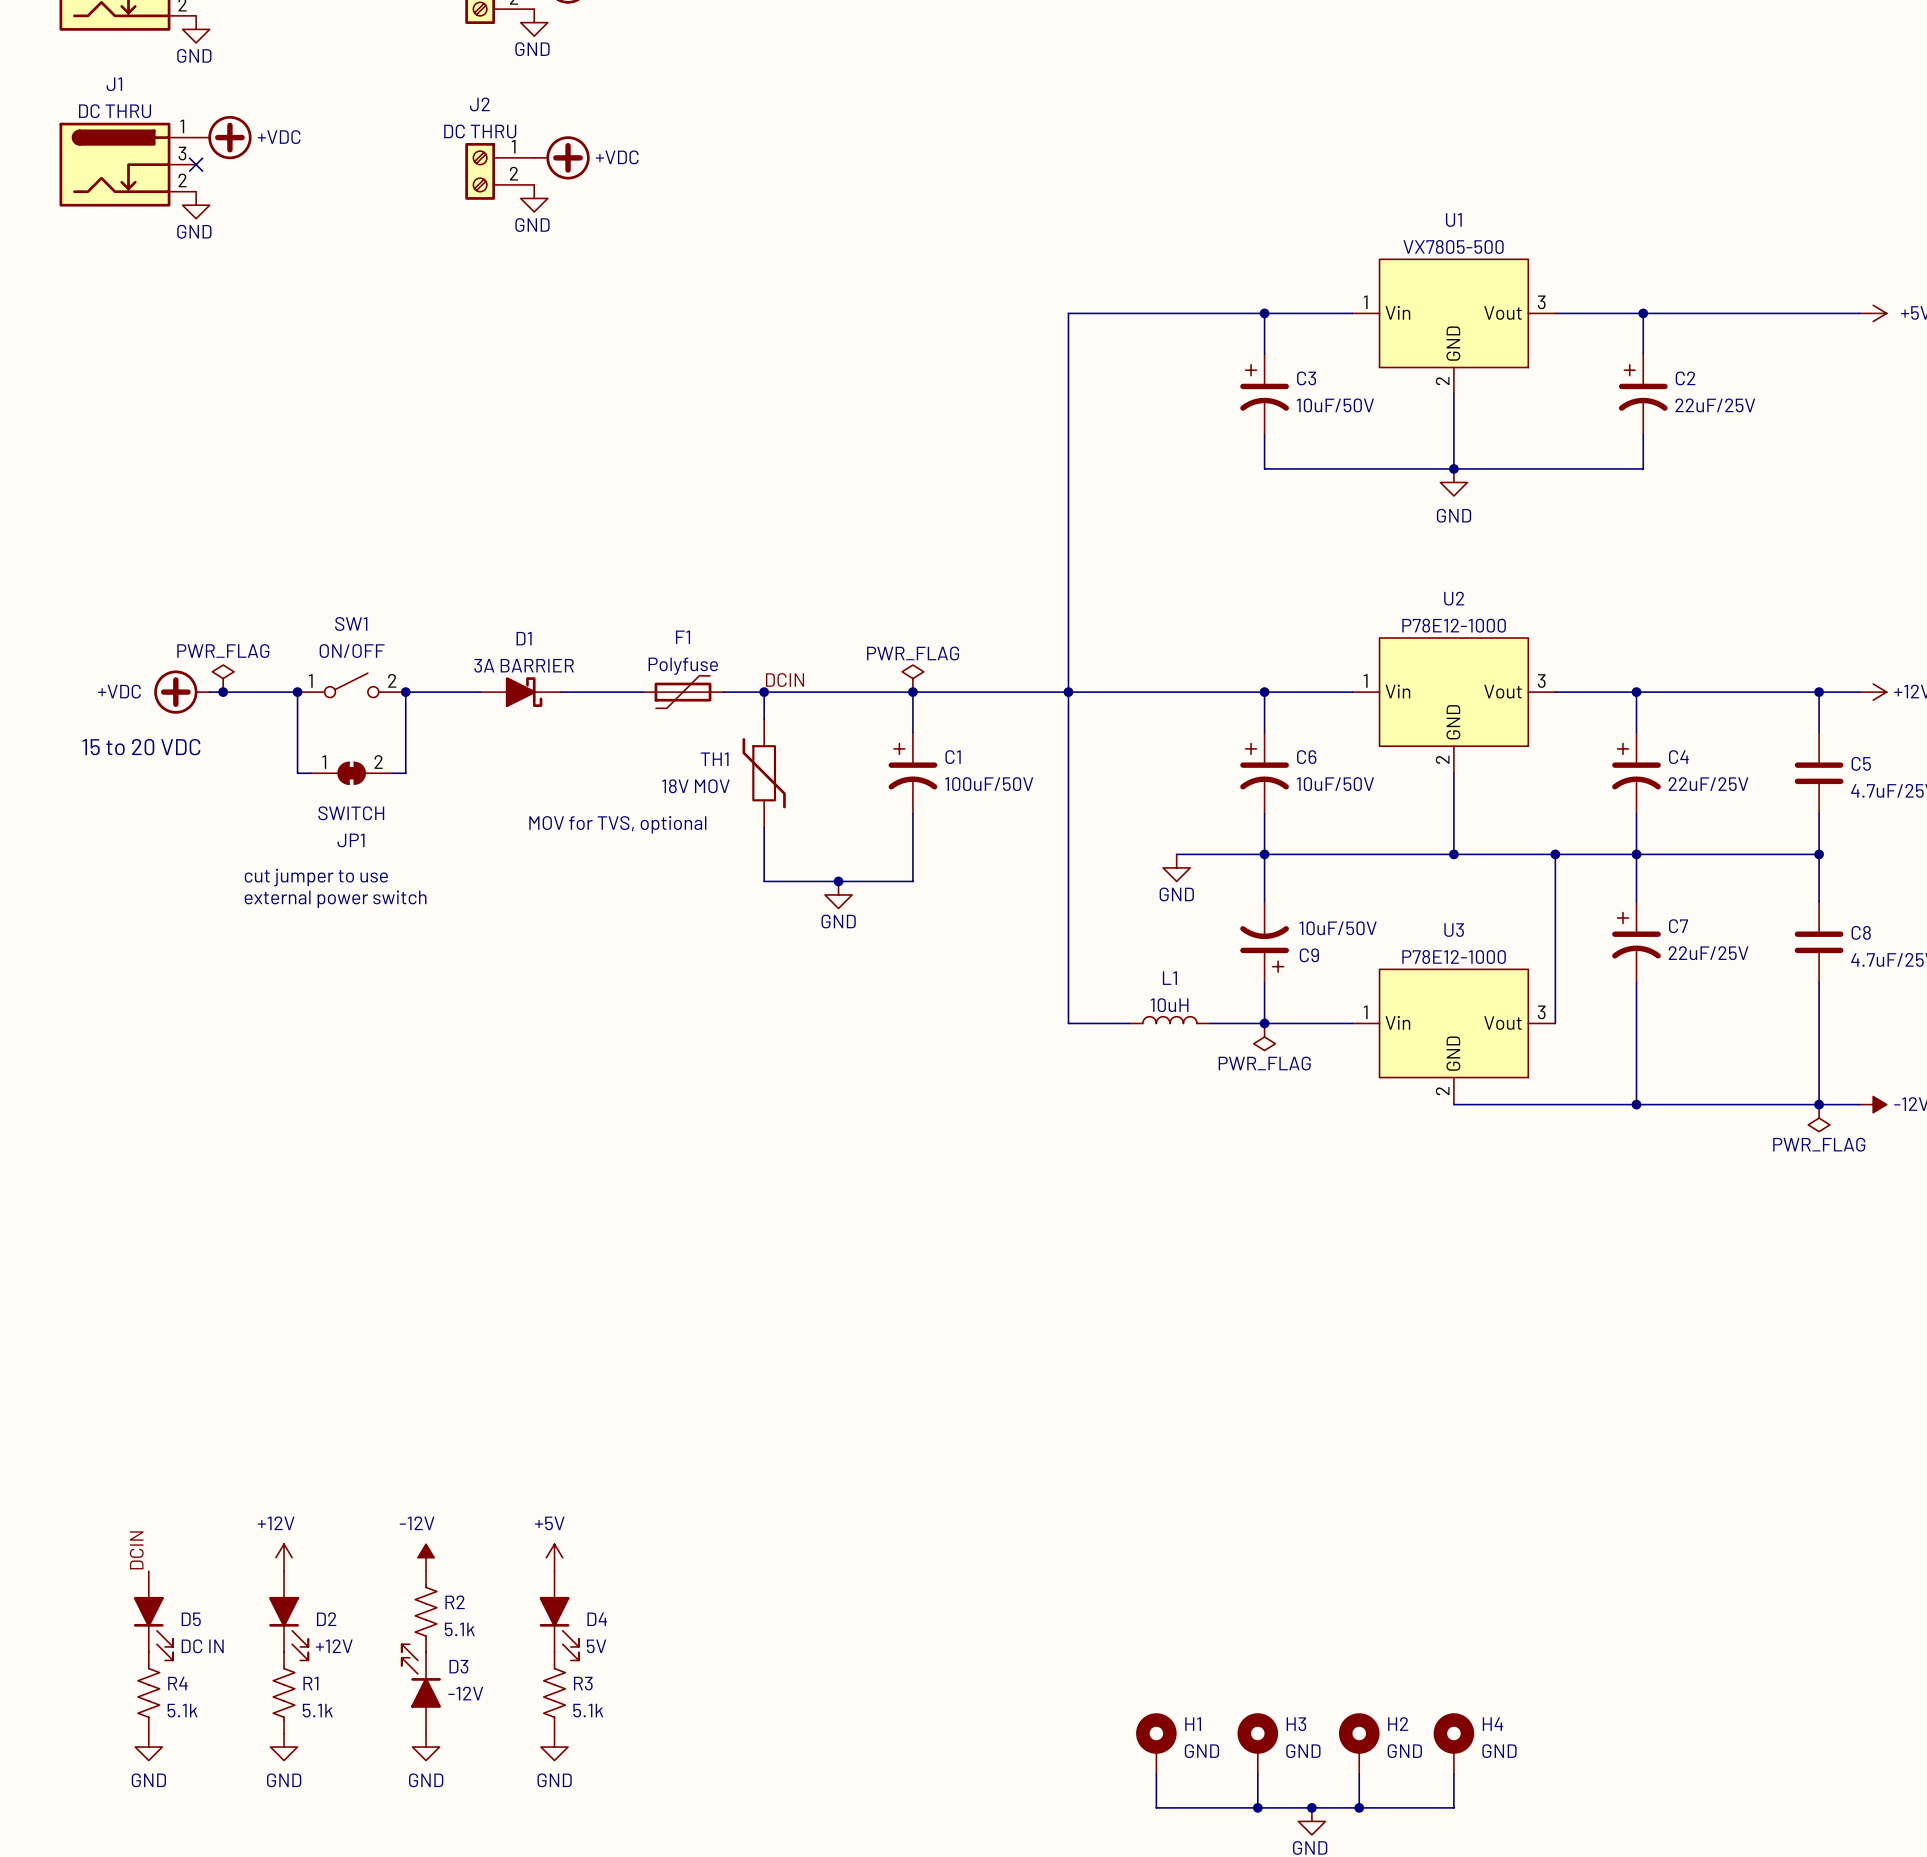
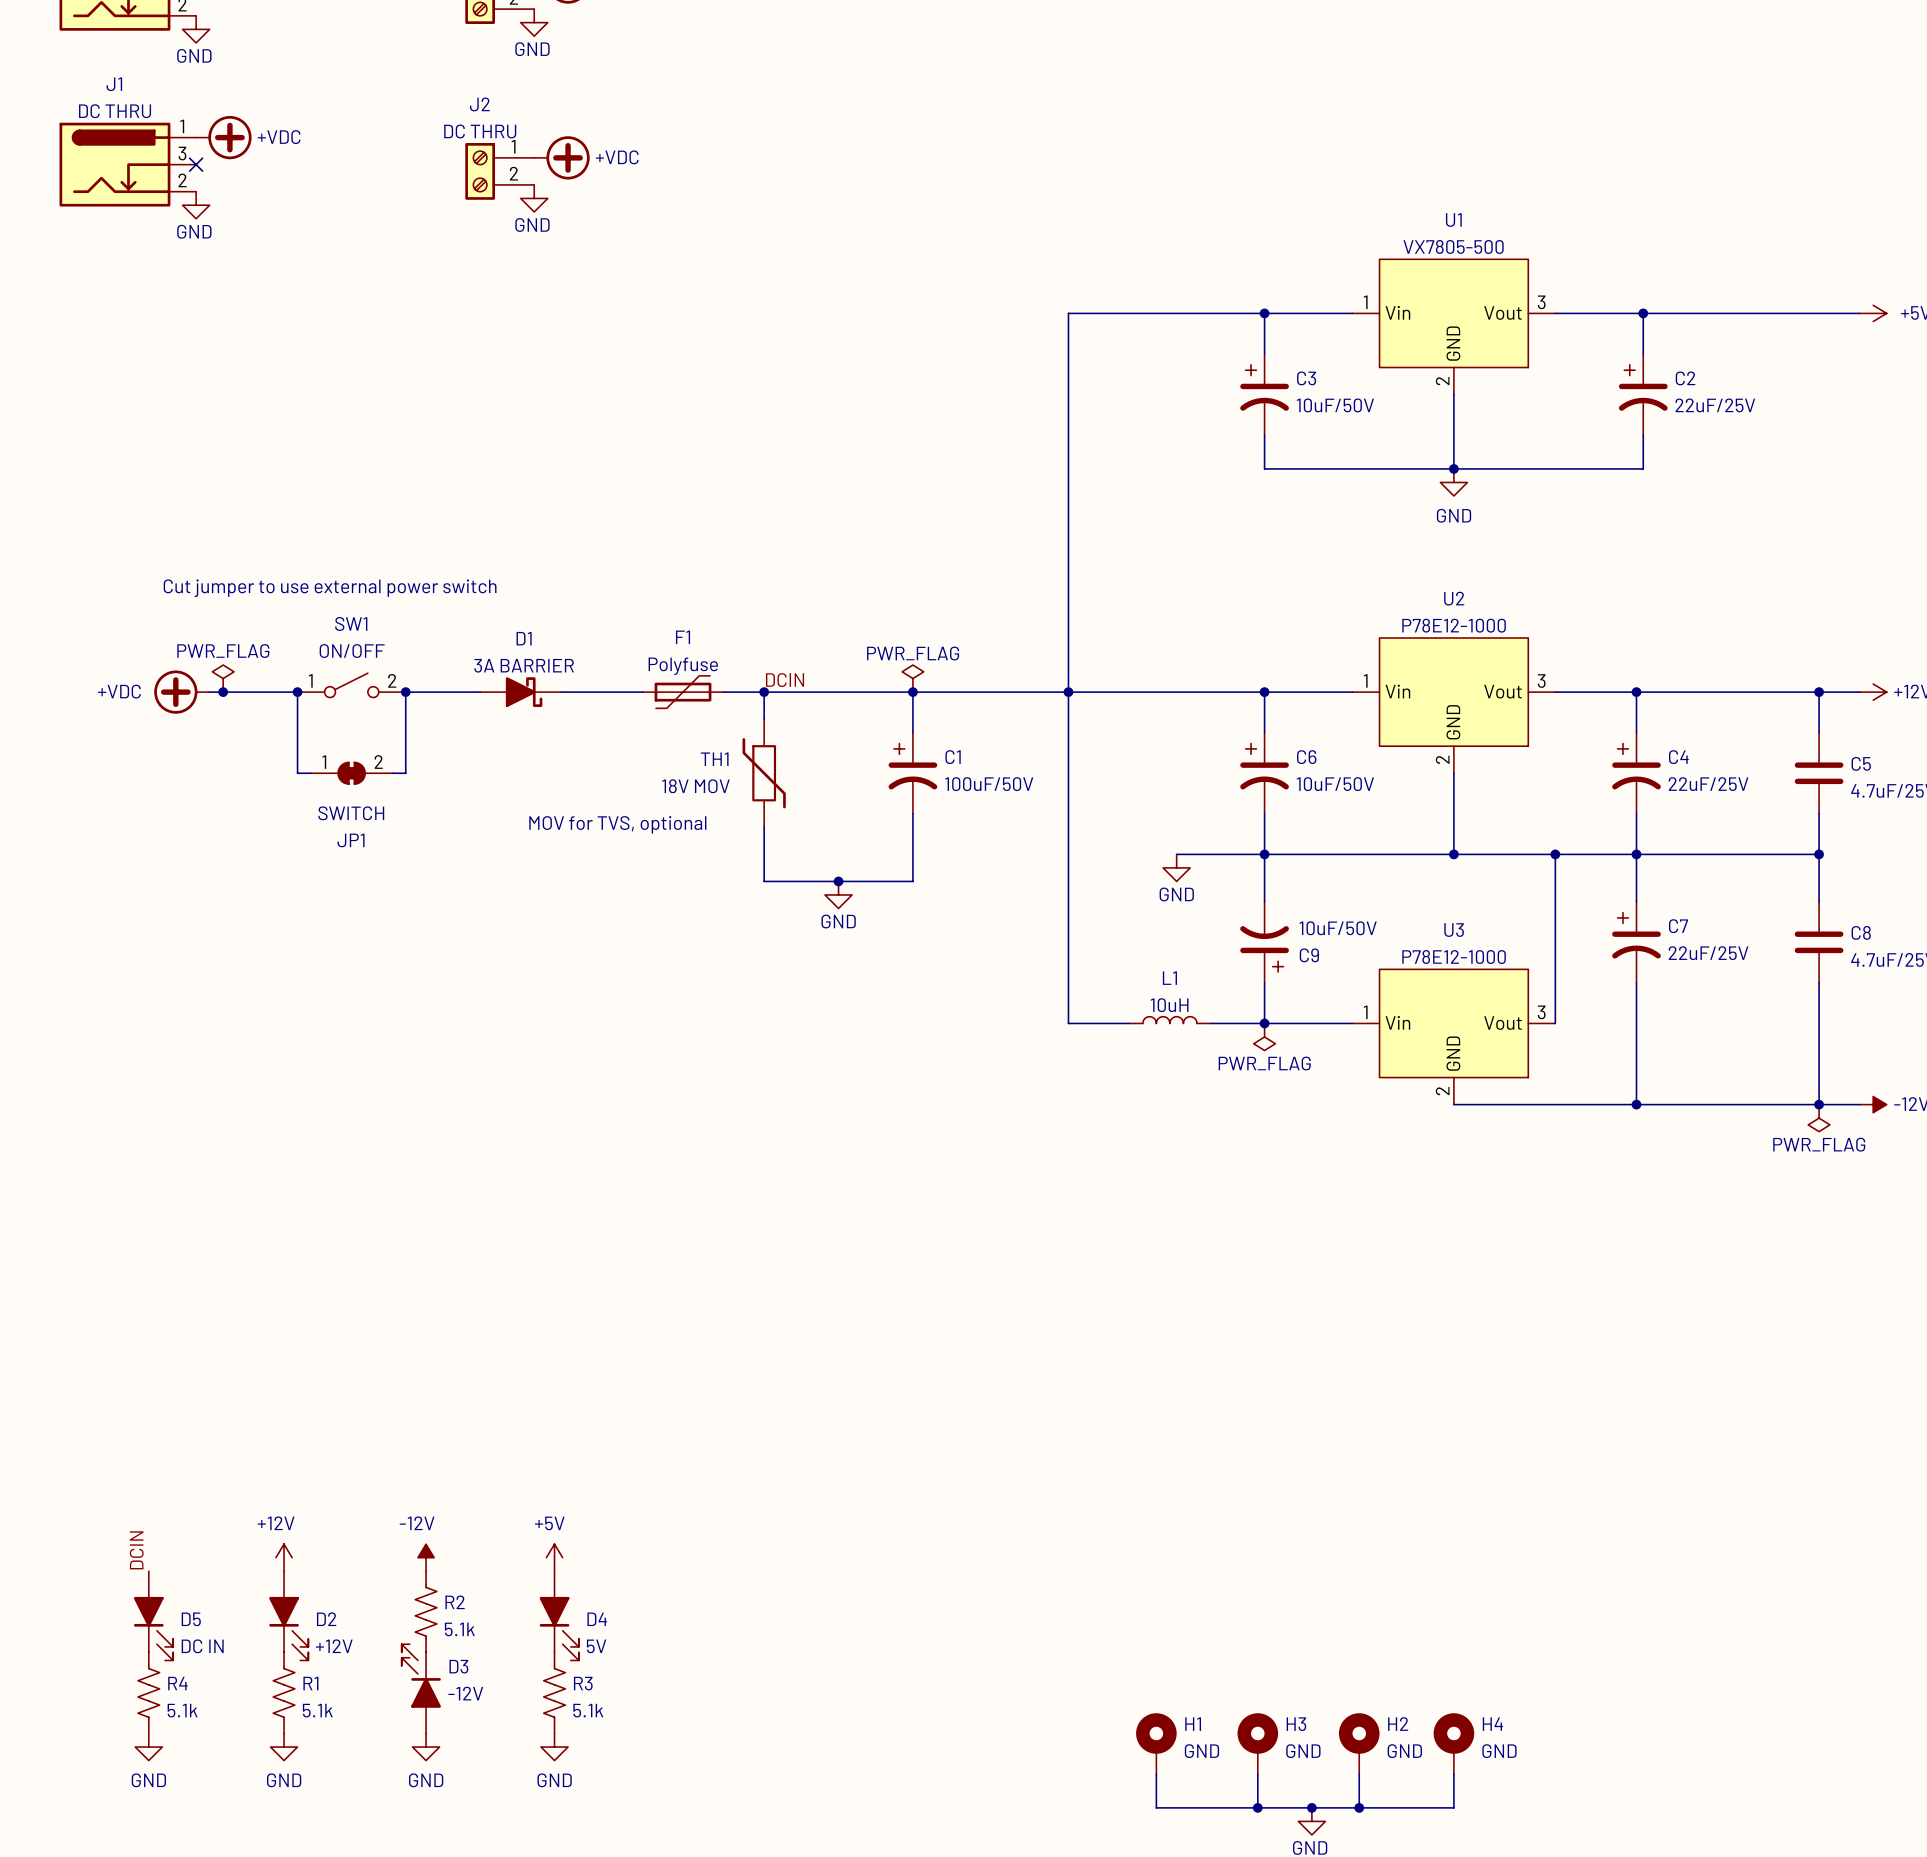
text: none -> Cut jumper to use external power switch (330, 588)
text: 15 to 20 VDC (141, 747) -> none
text: cut jumper to use (316, 877) -> none
text: external power switch (335, 899) -> none

